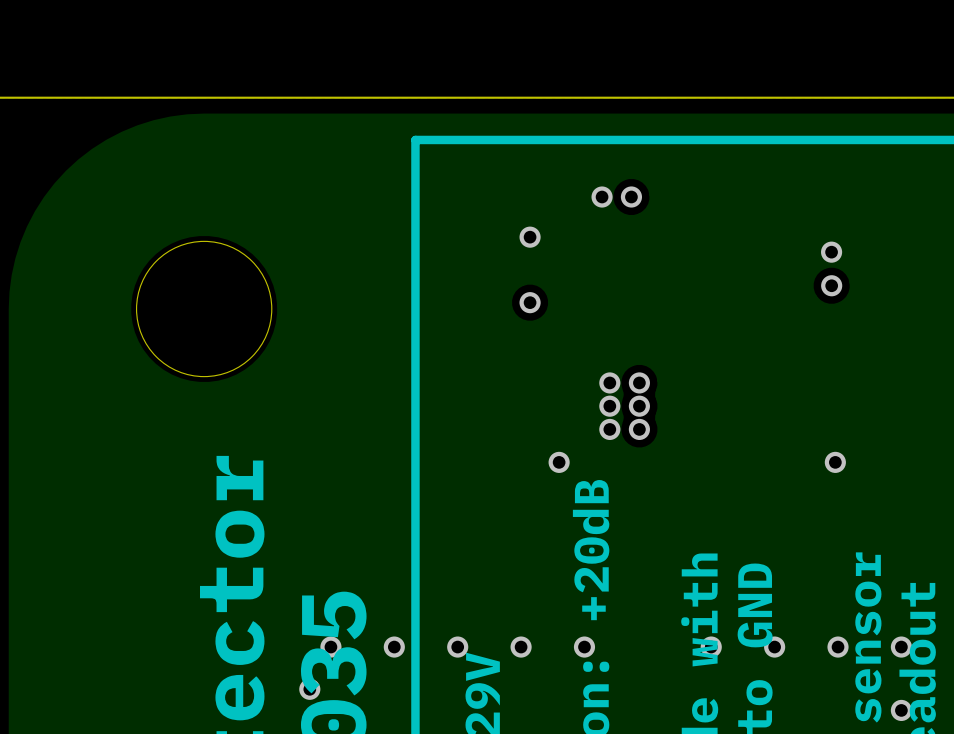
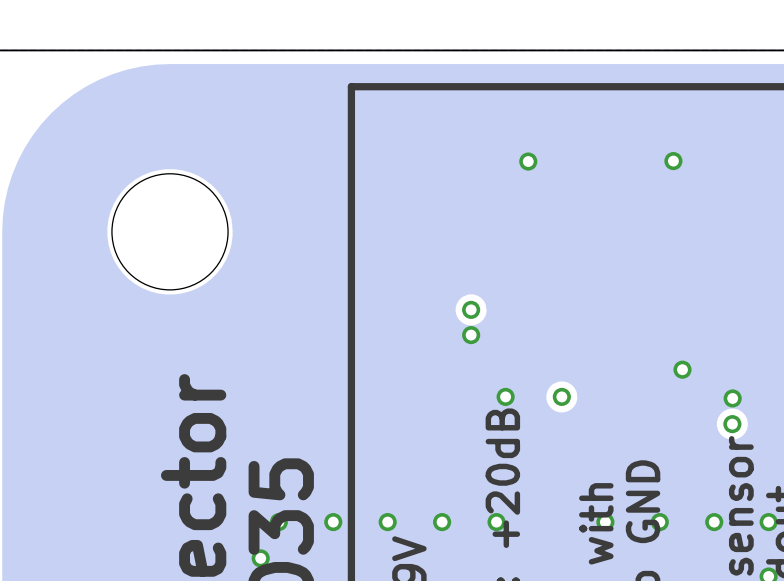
via: (631, 196) -> none
via: (602, 197) -> none
via: none -> (673, 161)
via: none -> (528, 161)
via: (530, 237) -> none
via: (831, 252) -> none
via: (831, 285) -> none
via: (530, 302) -> none
via: (609, 382) -> none
via: (639, 382) -> none
via: none -> (471, 309)
via: (609, 406) -> none
via: (639, 406) -> none
via: none -> (471, 335)
via: (609, 429) -> none
via: (639, 429) -> none
via: (559, 462) -> none
via: (835, 462) -> none
via: none -> (682, 369)
via: none -> (505, 396)
via: none -> (561, 396)
via: none -> (732, 398)
via: none -> (732, 424)

